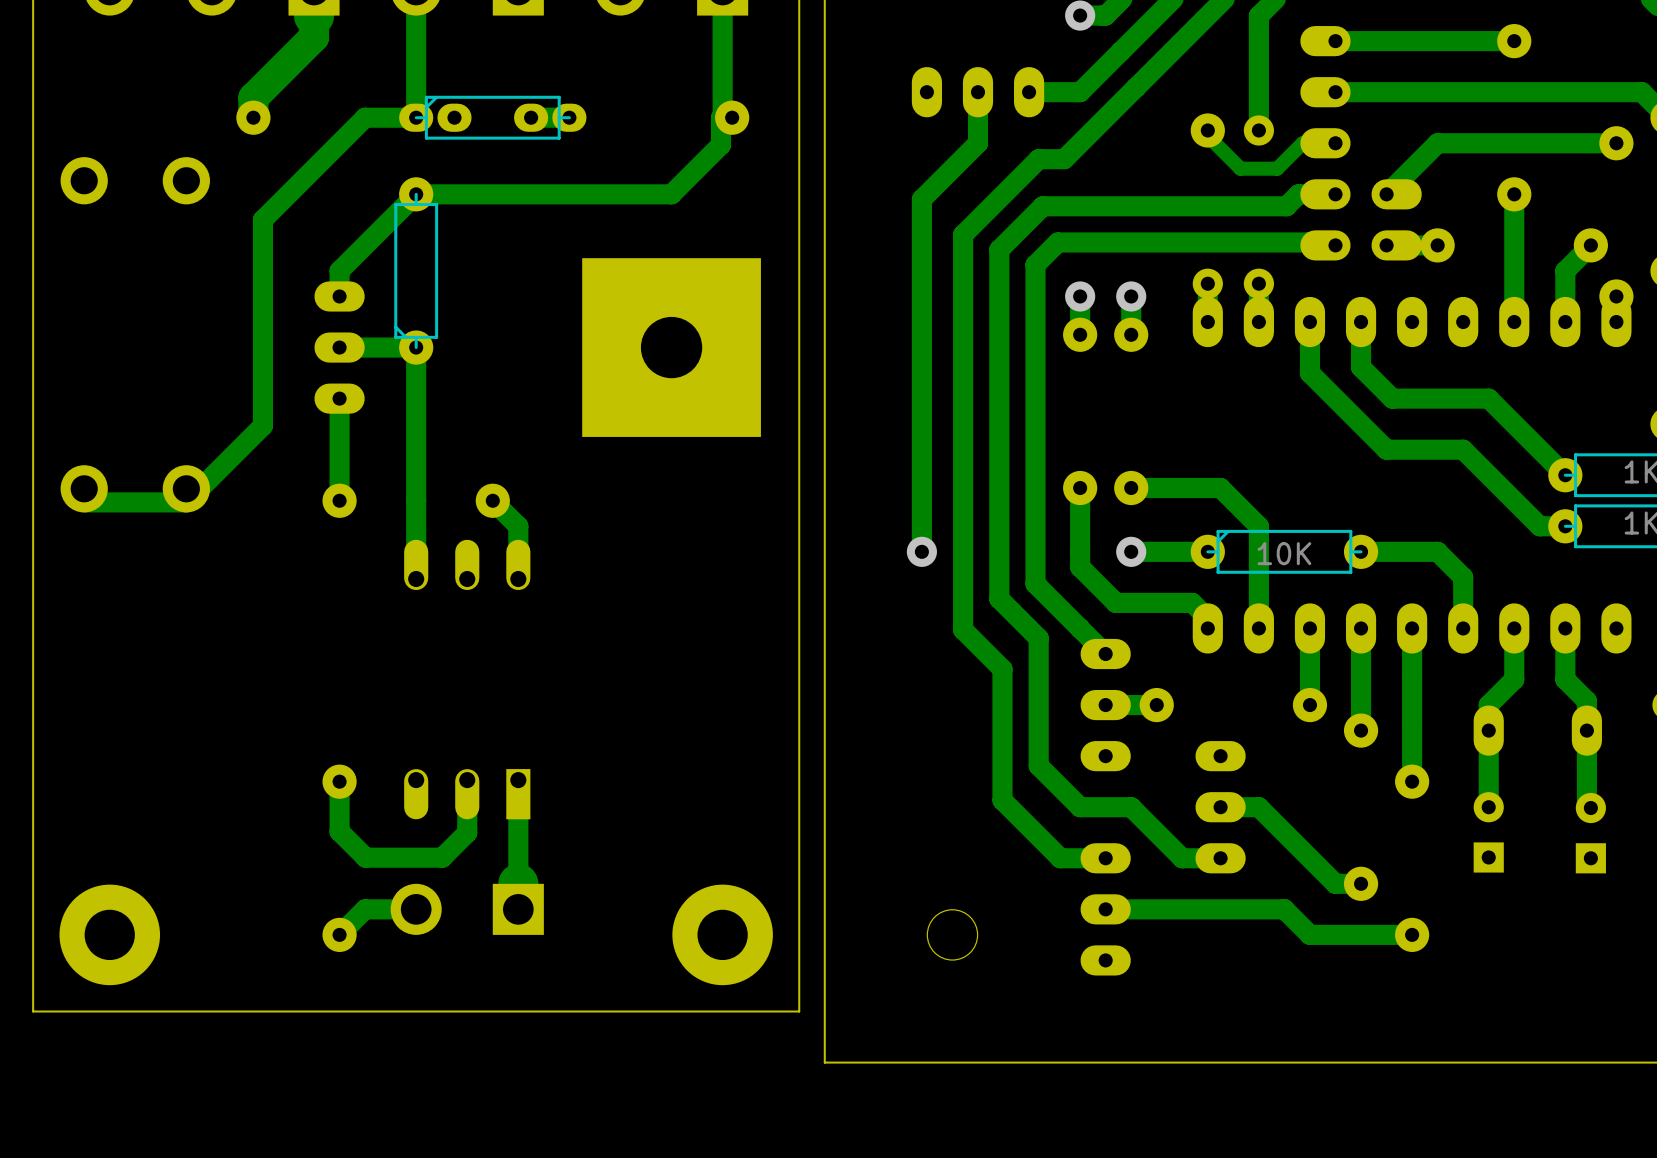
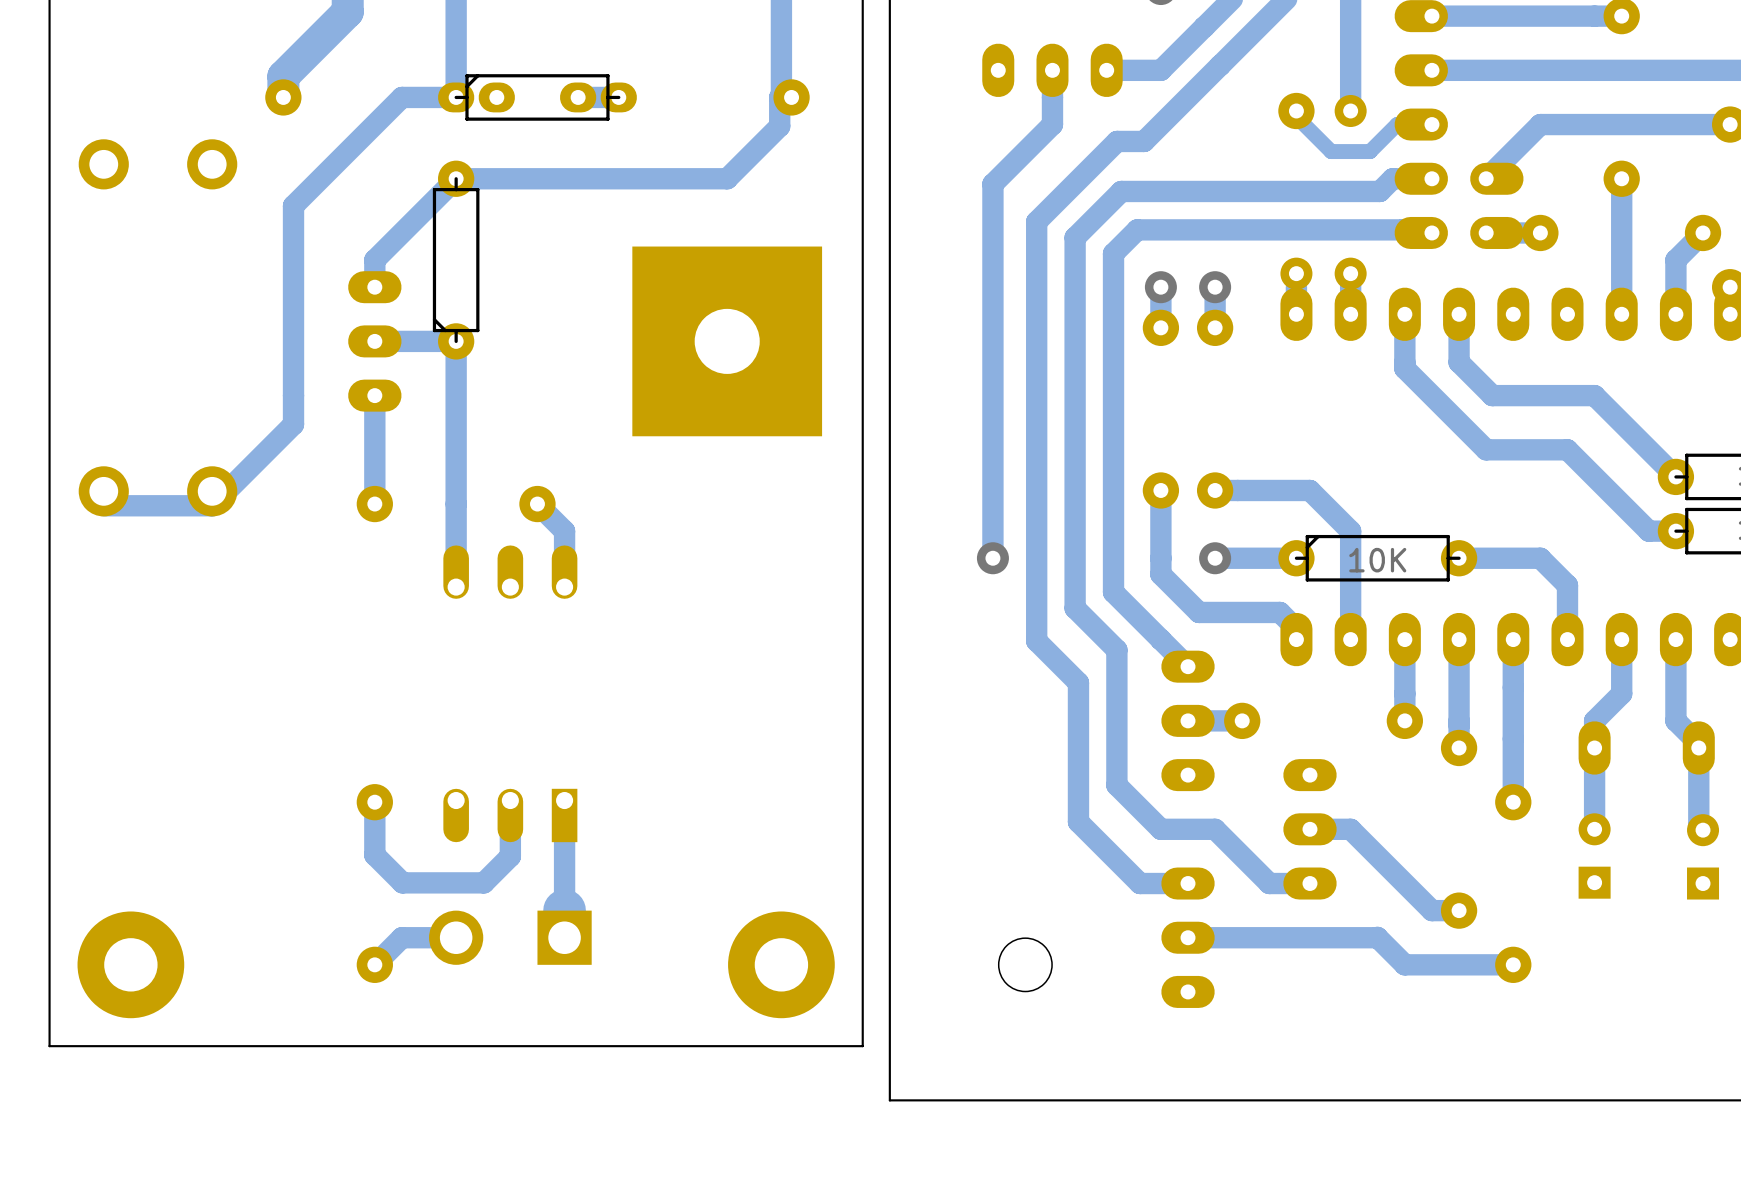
track: (1565, 679) (1586, 701) (1586, 726) -> (1675, 693) (1675, 720) (1698, 743)

